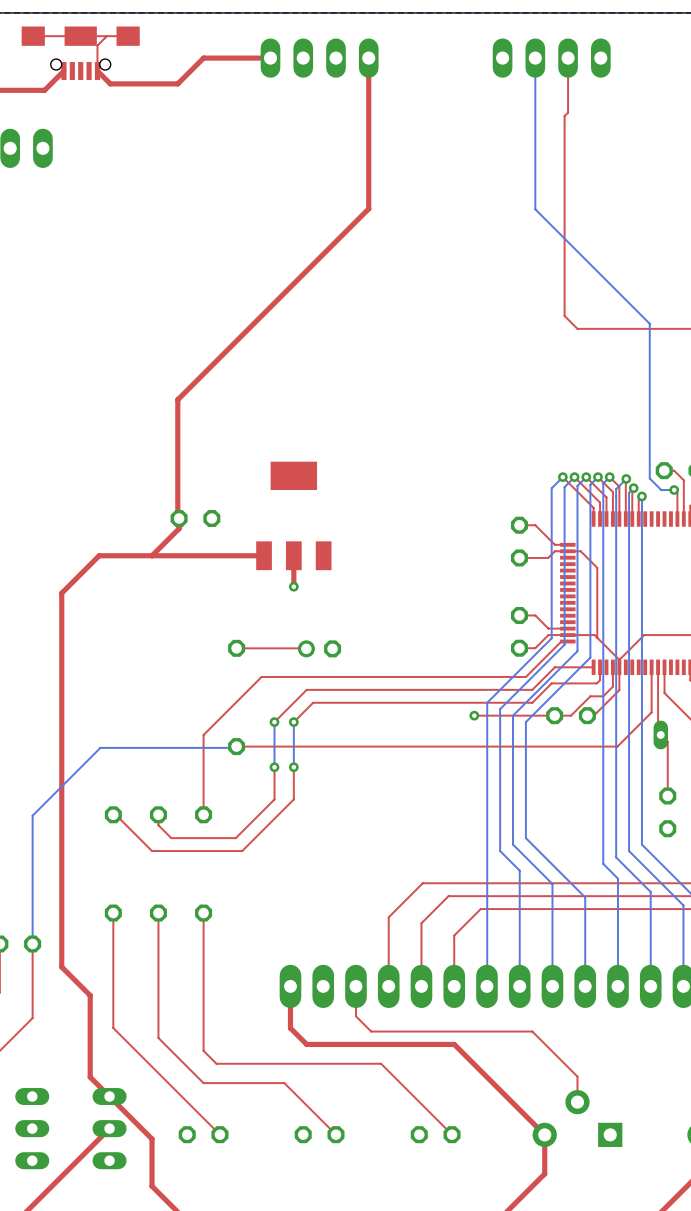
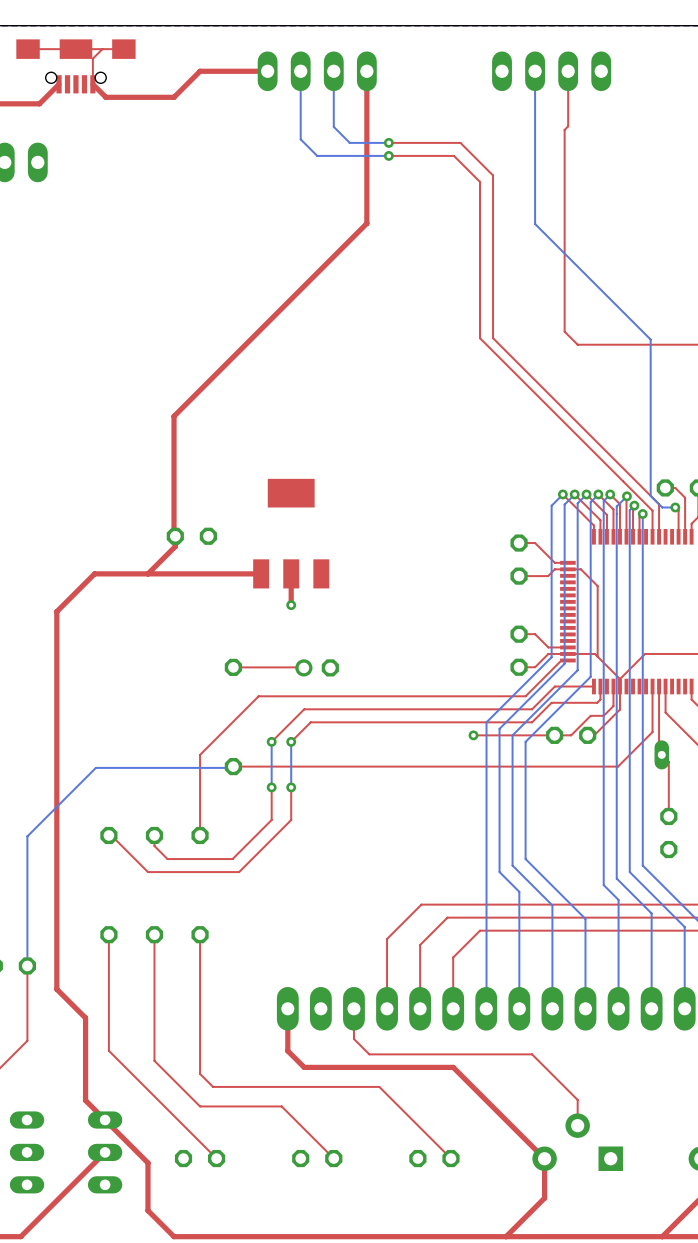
bottom track: none -> (300, 71) (300, 139) (317, 155) (388, 155)
bottom track: none -> (333, 71) (333, 126) (349, 142) (388, 142)
top track: none -> (388, 142) (460, 142) (493, 175) (493, 338) (659, 504) (659, 536)
via: none -> (388, 142)
top track: none -> (388, 155) (453, 155) (480, 181) (480, 338) (652, 510) (652, 536)
via: none -> (388, 155)

